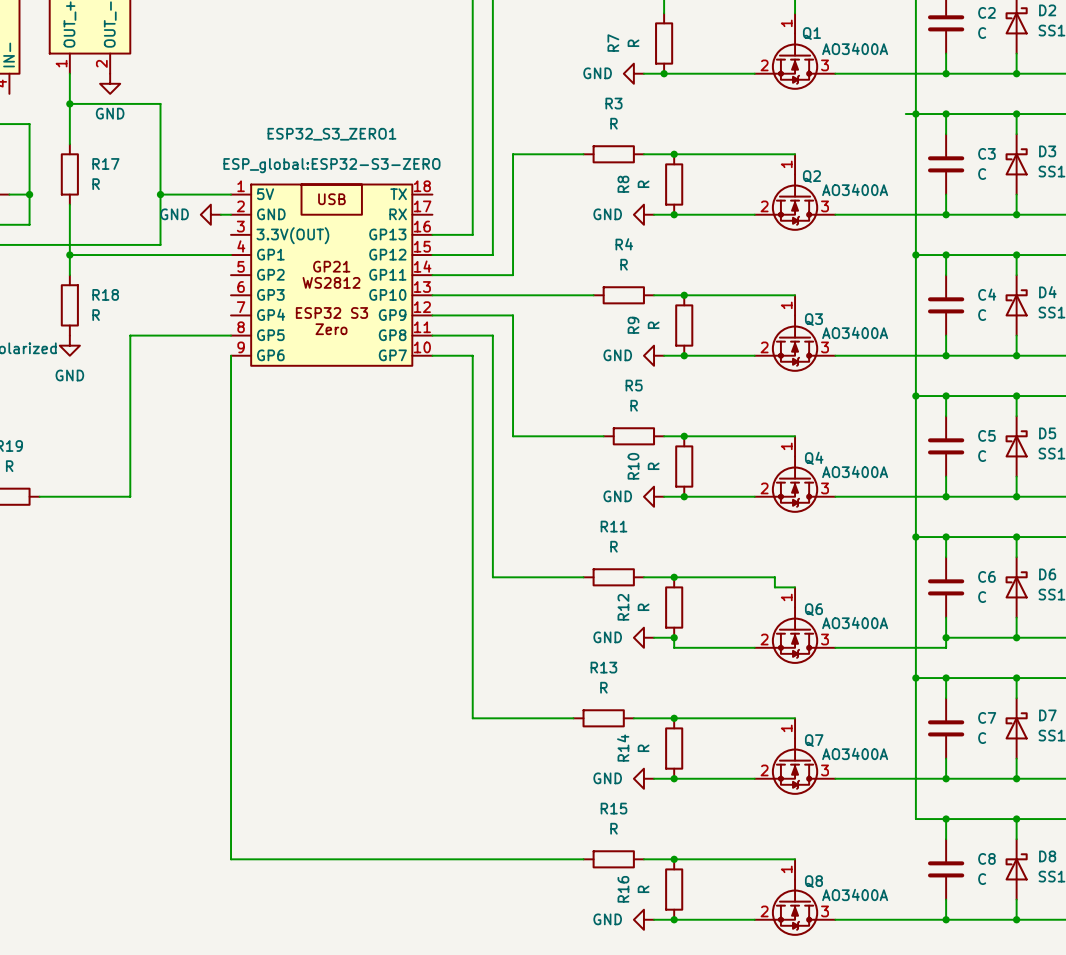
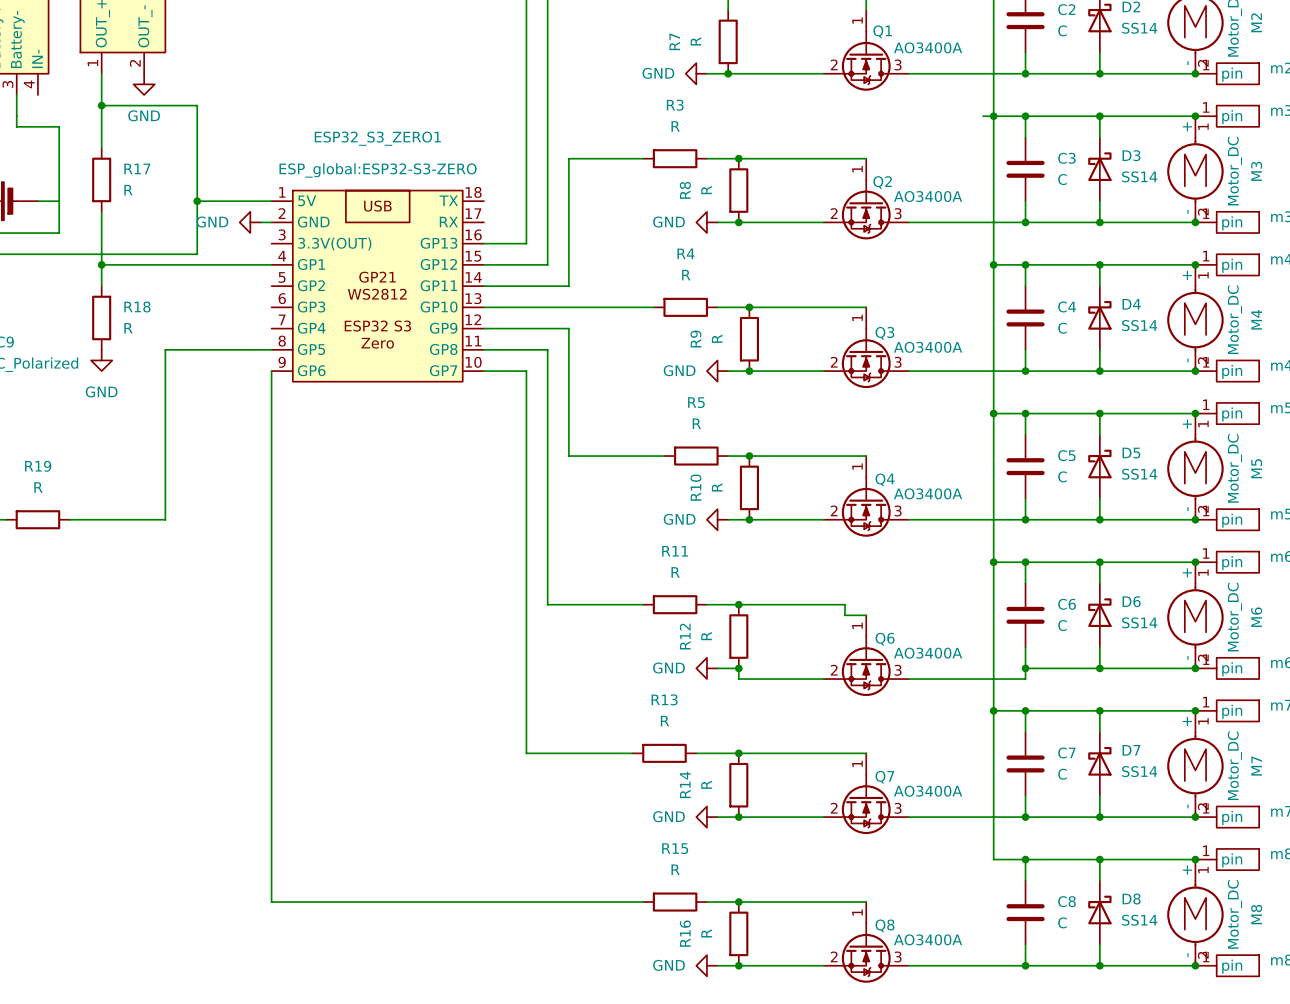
junction: (29, 194) -> none

